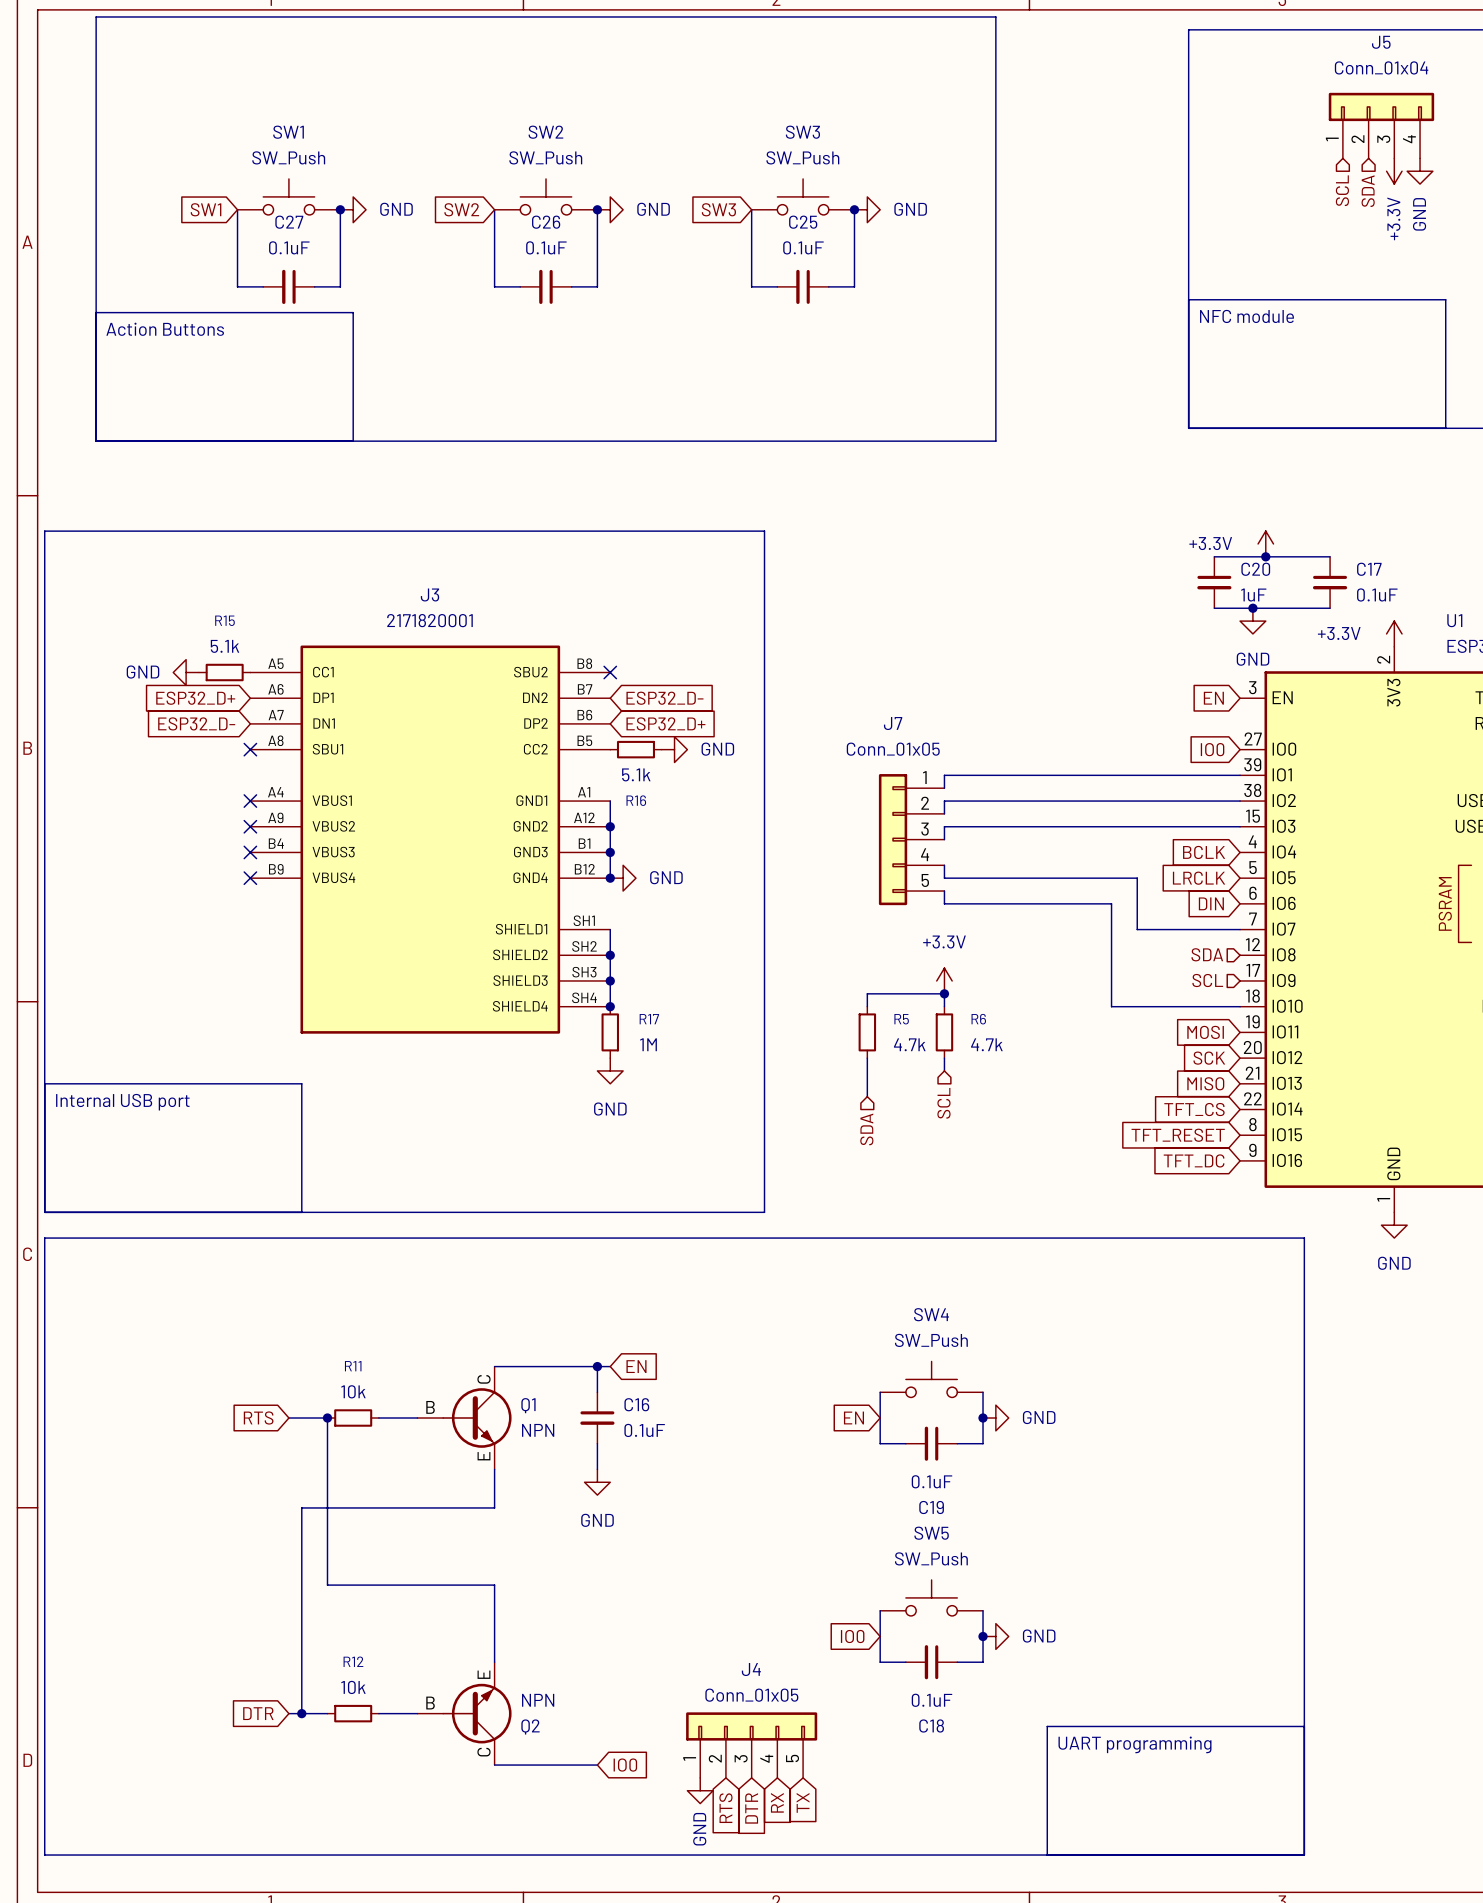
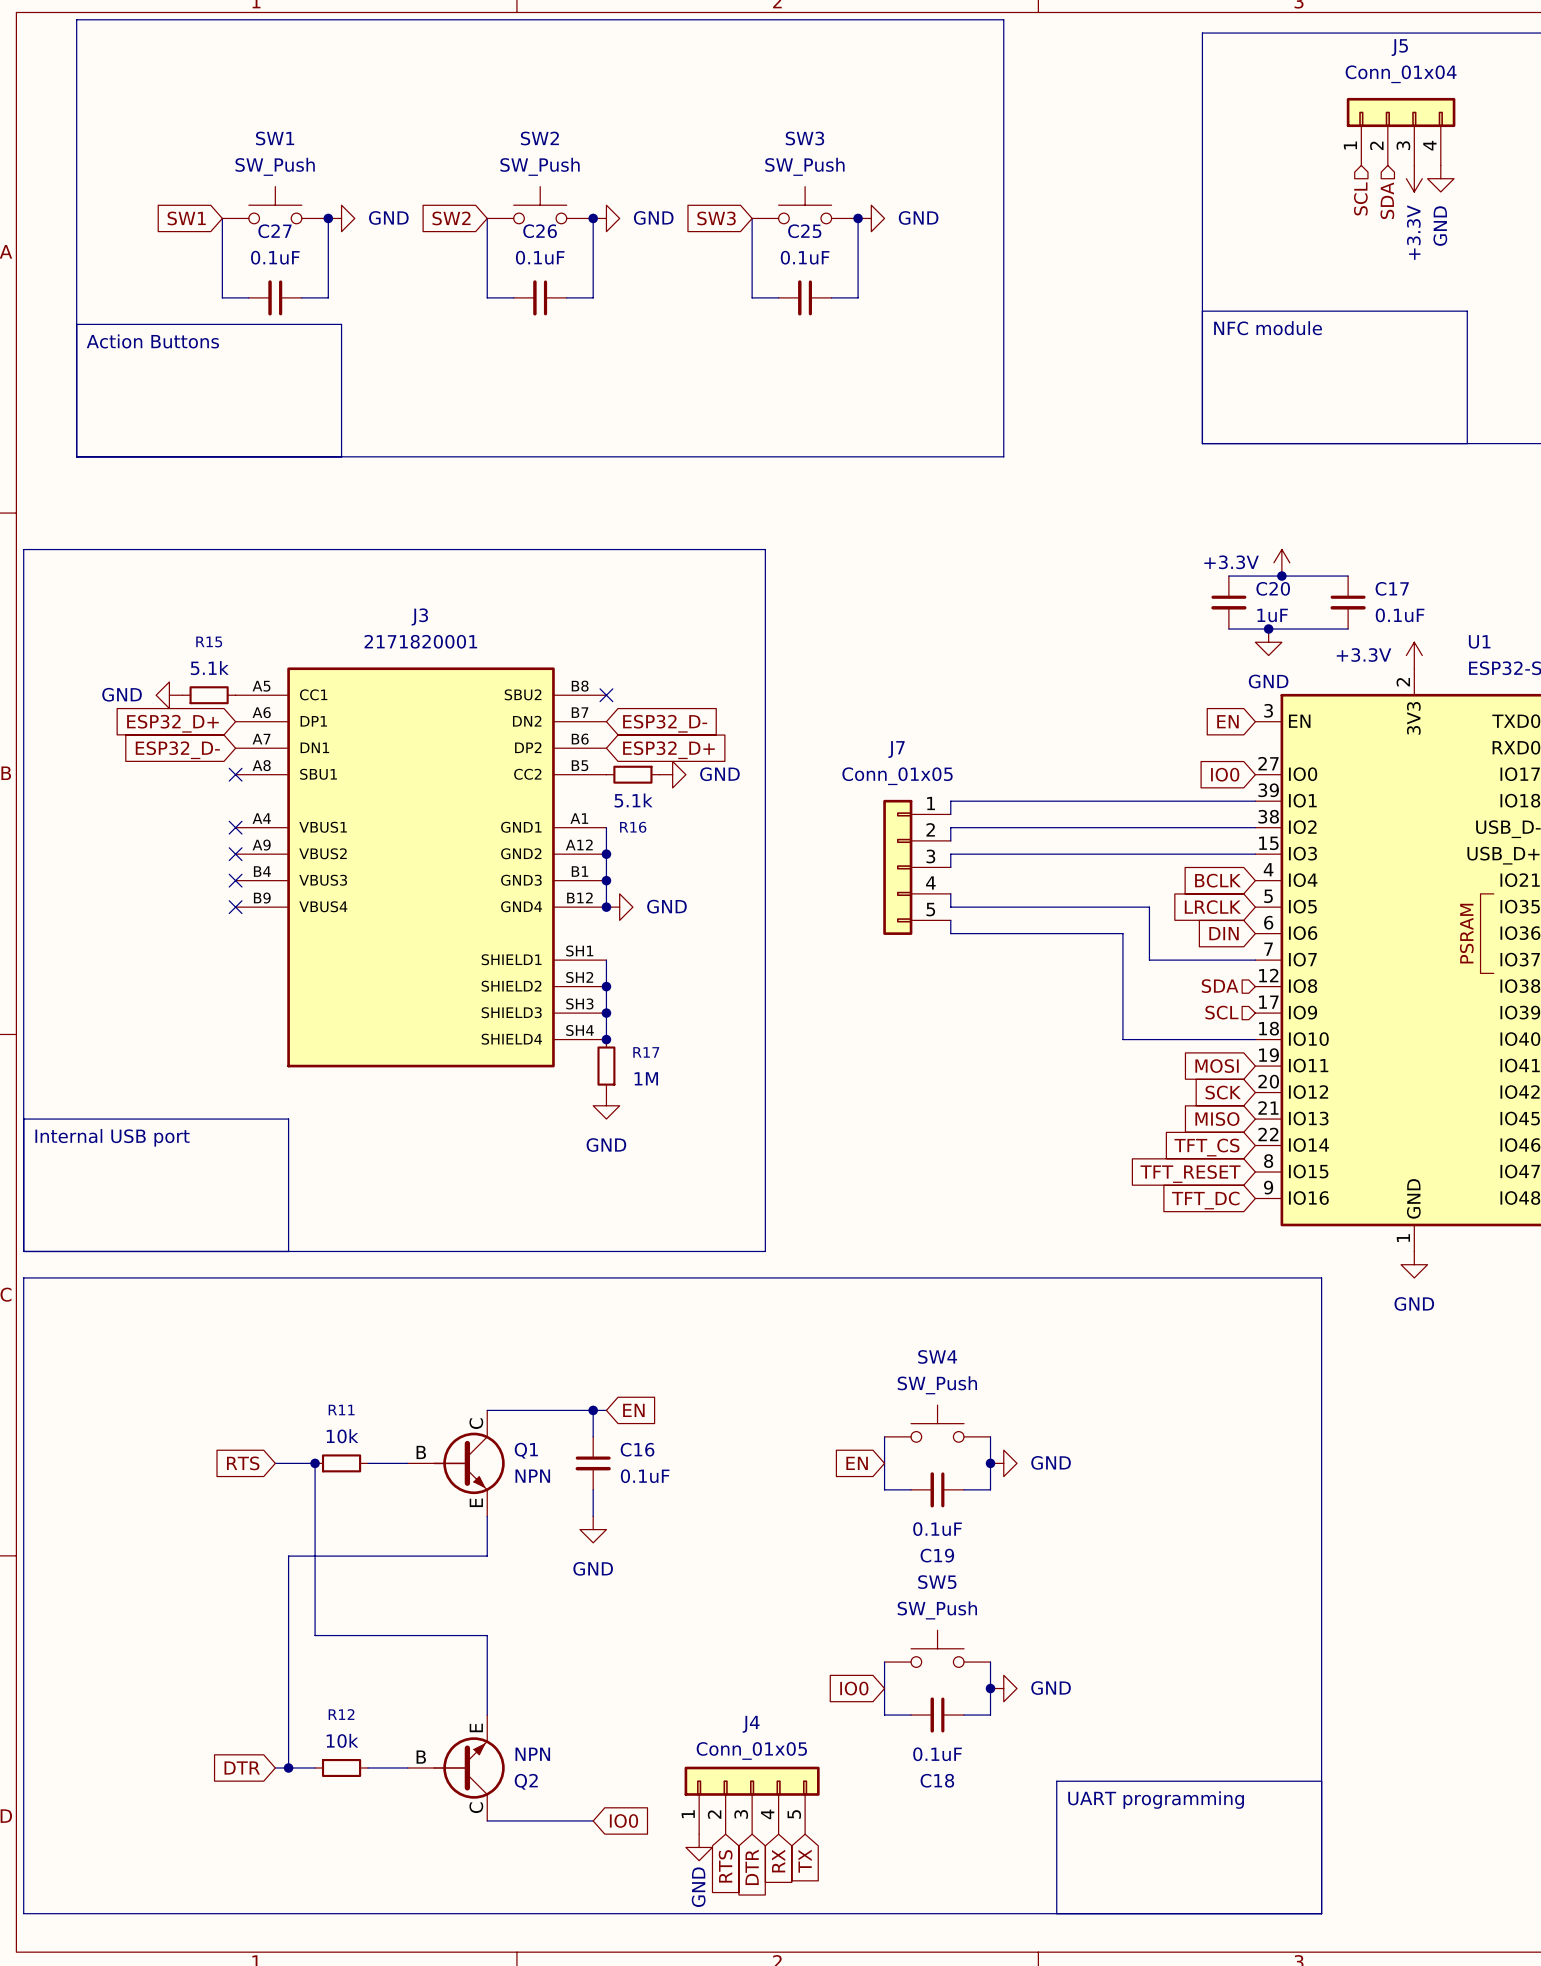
power symbol: +3.3V (944, 980) -> none
junction: (944, 993) -> none
wire: (867, 1006) (867, 993) (944, 993) (944, 1006) -> none
R5: 4.7k (867, 1032) -> none
R6: 4.7k (944, 1032) -> none
wire: (867, 1058) (867, 1096) -> none
wire: (944, 1058) (944, 1070) -> none
hierarchical label: SCL (943, 1103) -> none
hierarchical label: SDA (866, 1129) -> none

